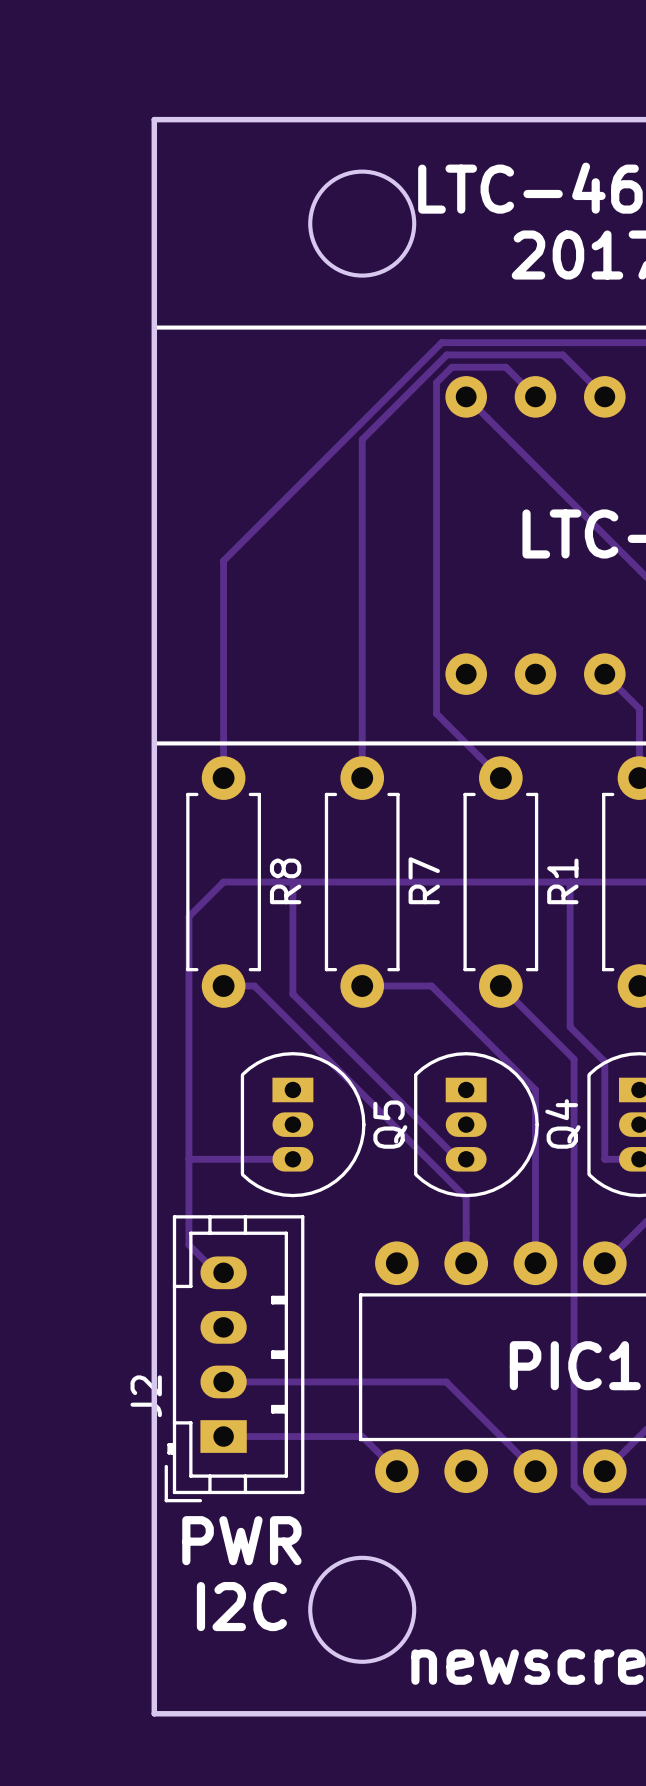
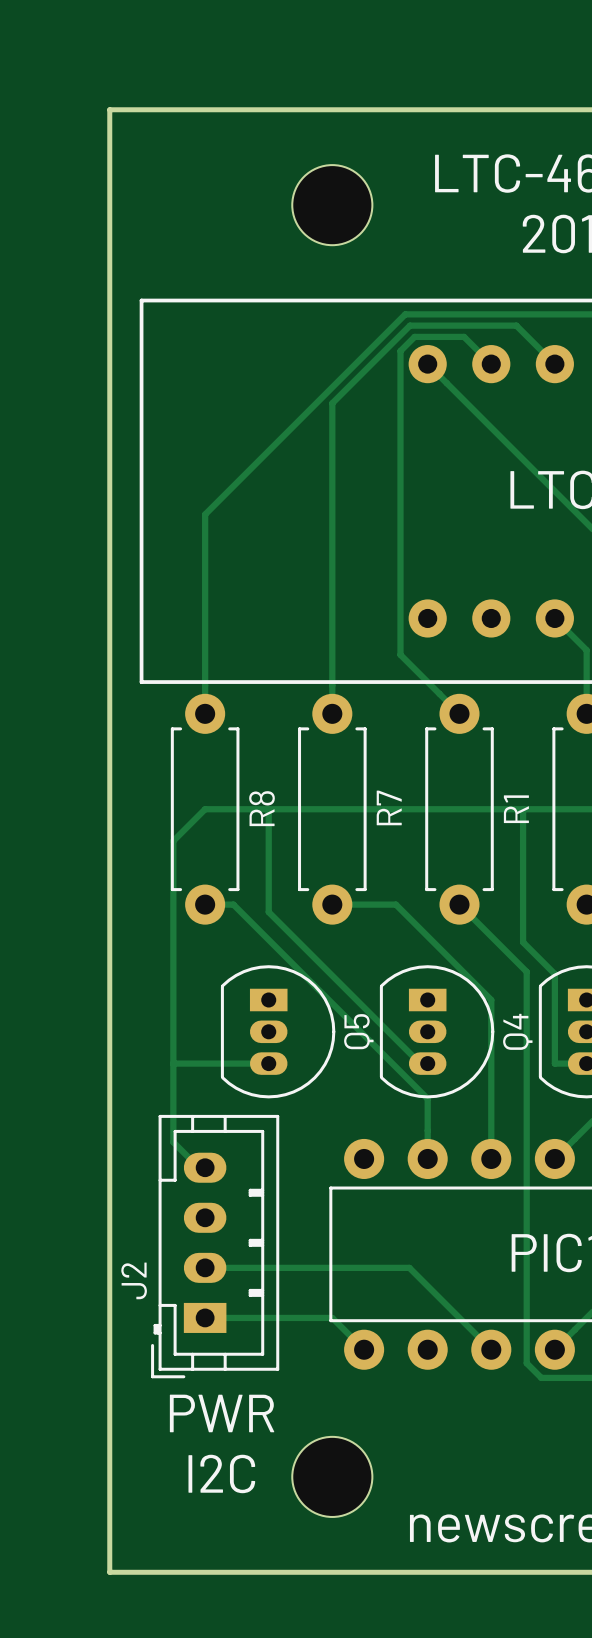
board edge: (154, 119) (154, 1713) -> (141, 109) (109, 109) (109, 1572) (141, 1572)
round board edge: [308, 169, 417, 278] -> none
part: none -> (332, 205)
round board edge: [308, 1555, 417, 1664] -> none
part: none -> (332, 1476)

